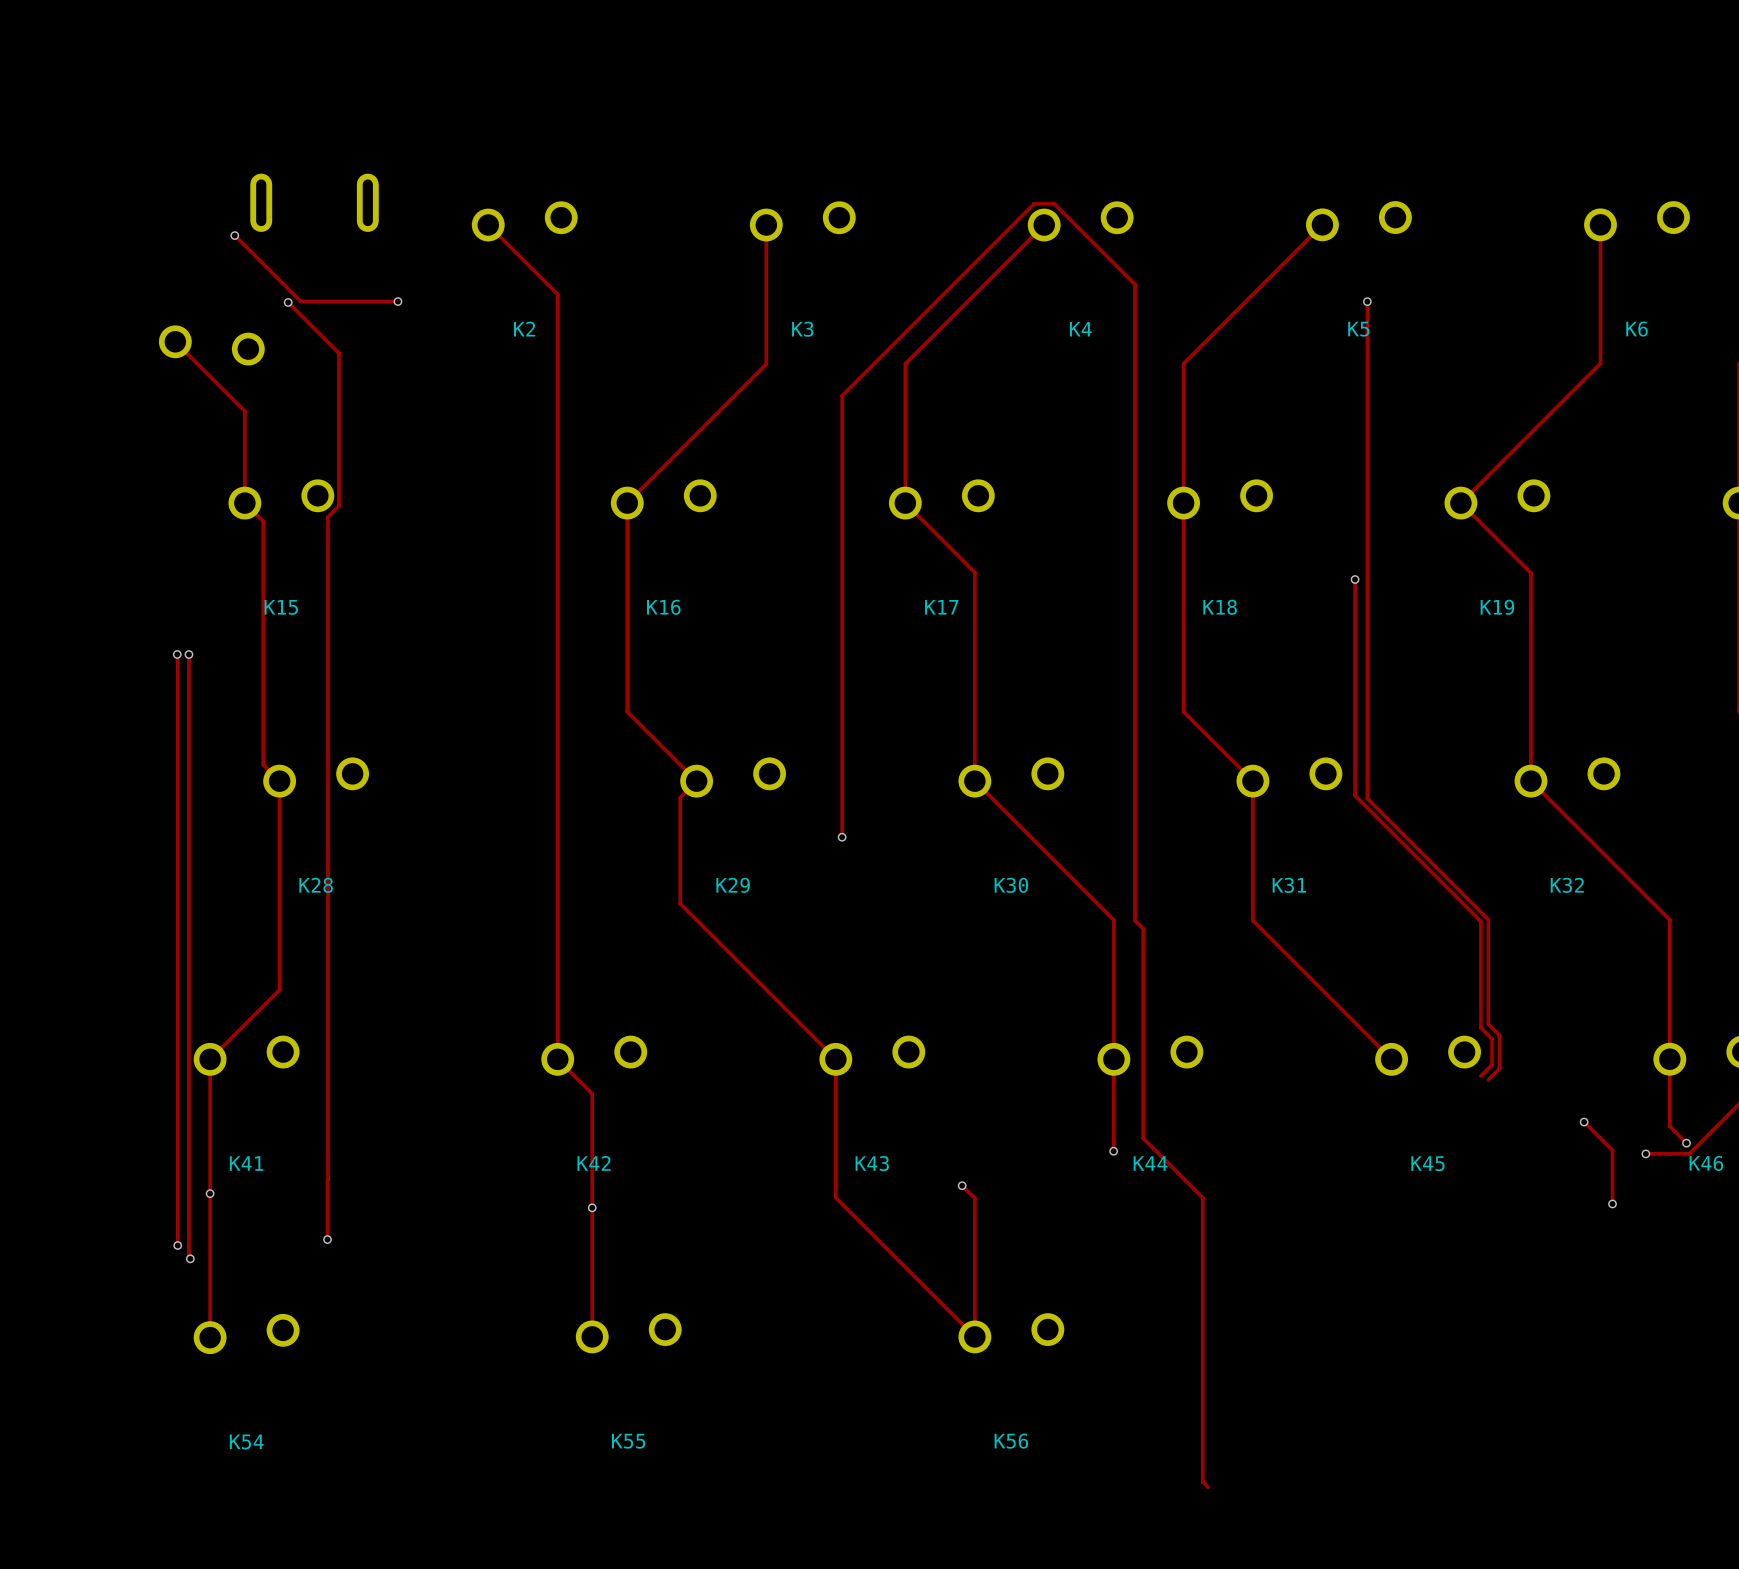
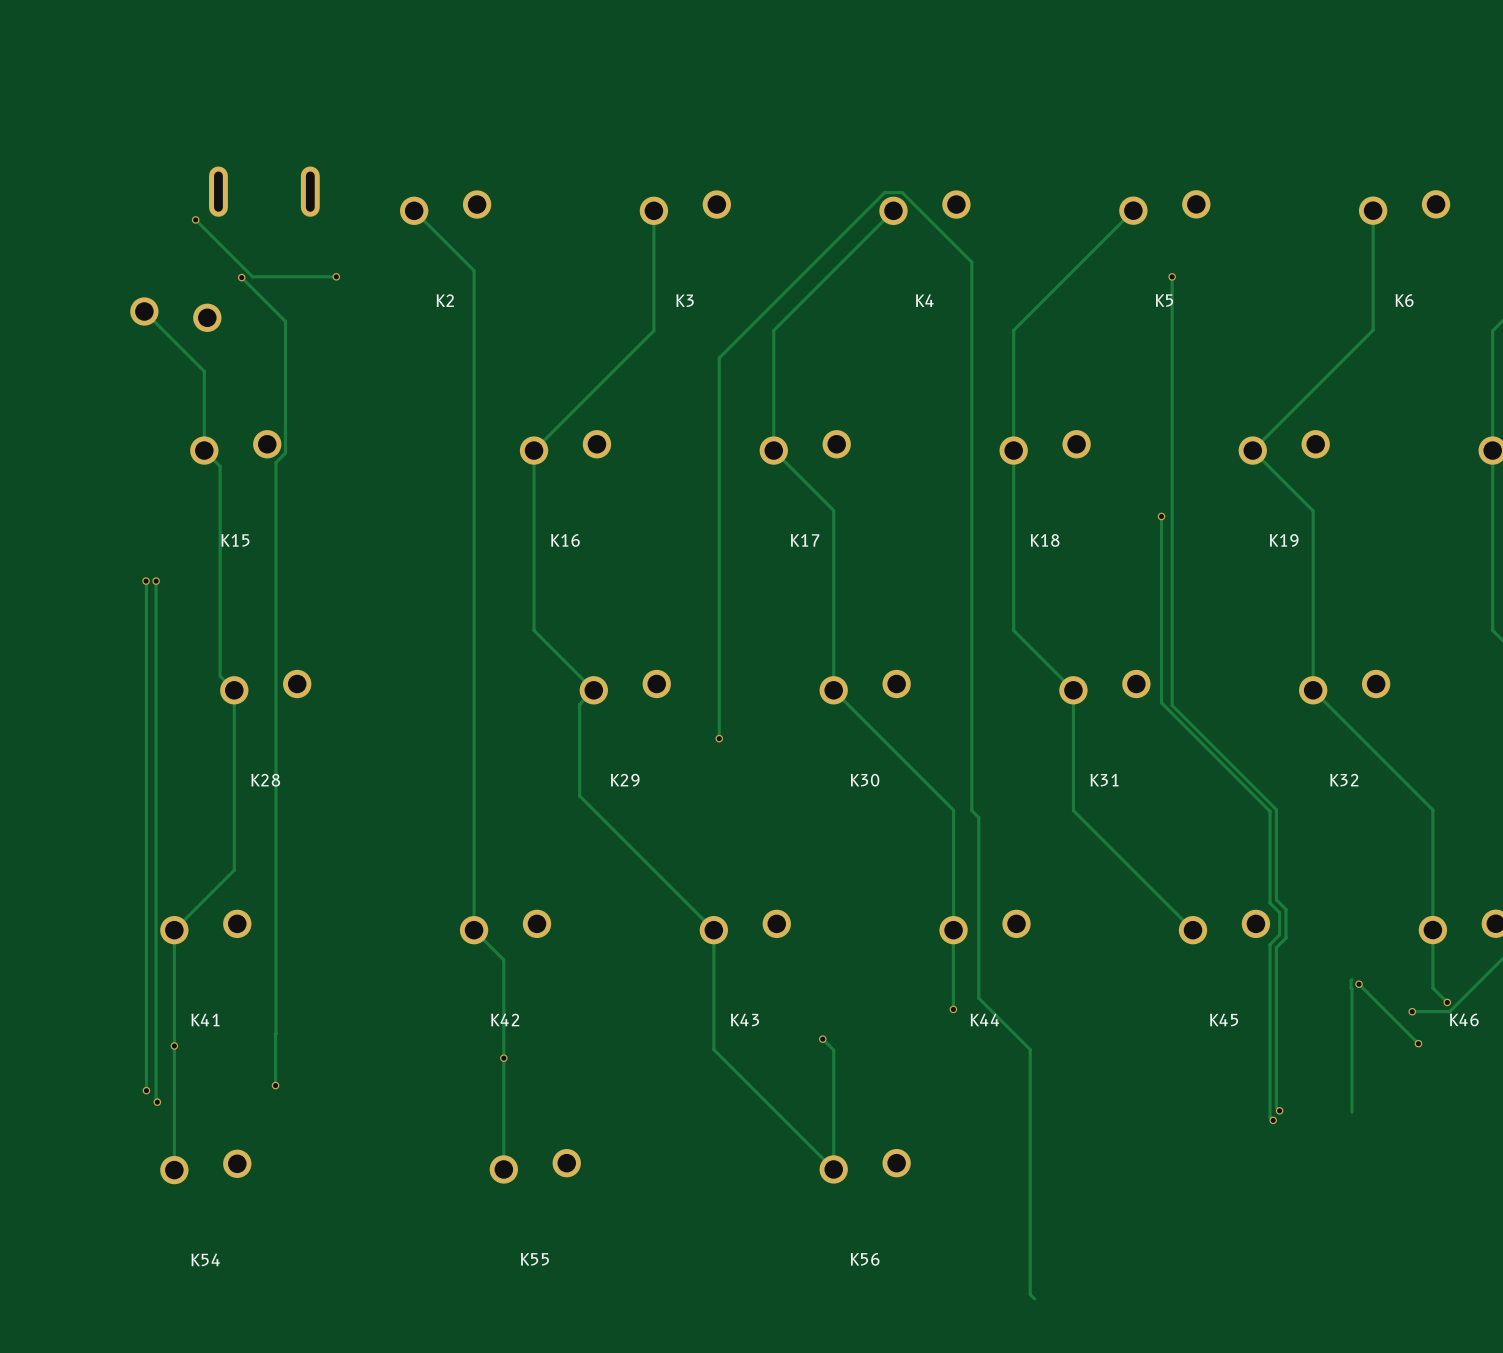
track: none -> (1270, 944) (1270, 1117) (1273, 1120)
track: none -> (1276, 947) (1276, 1107) (1279, 1110)
track: none -> (1351, 979) (1351, 1112)
track: (1612, 1150) (1612, 1203) -> (1383, 1008) (1418, 1043)
via position: (1612, 1203) -> (1418, 1043)
via: none -> (1279, 1110)
via: none -> (1273, 1120)

